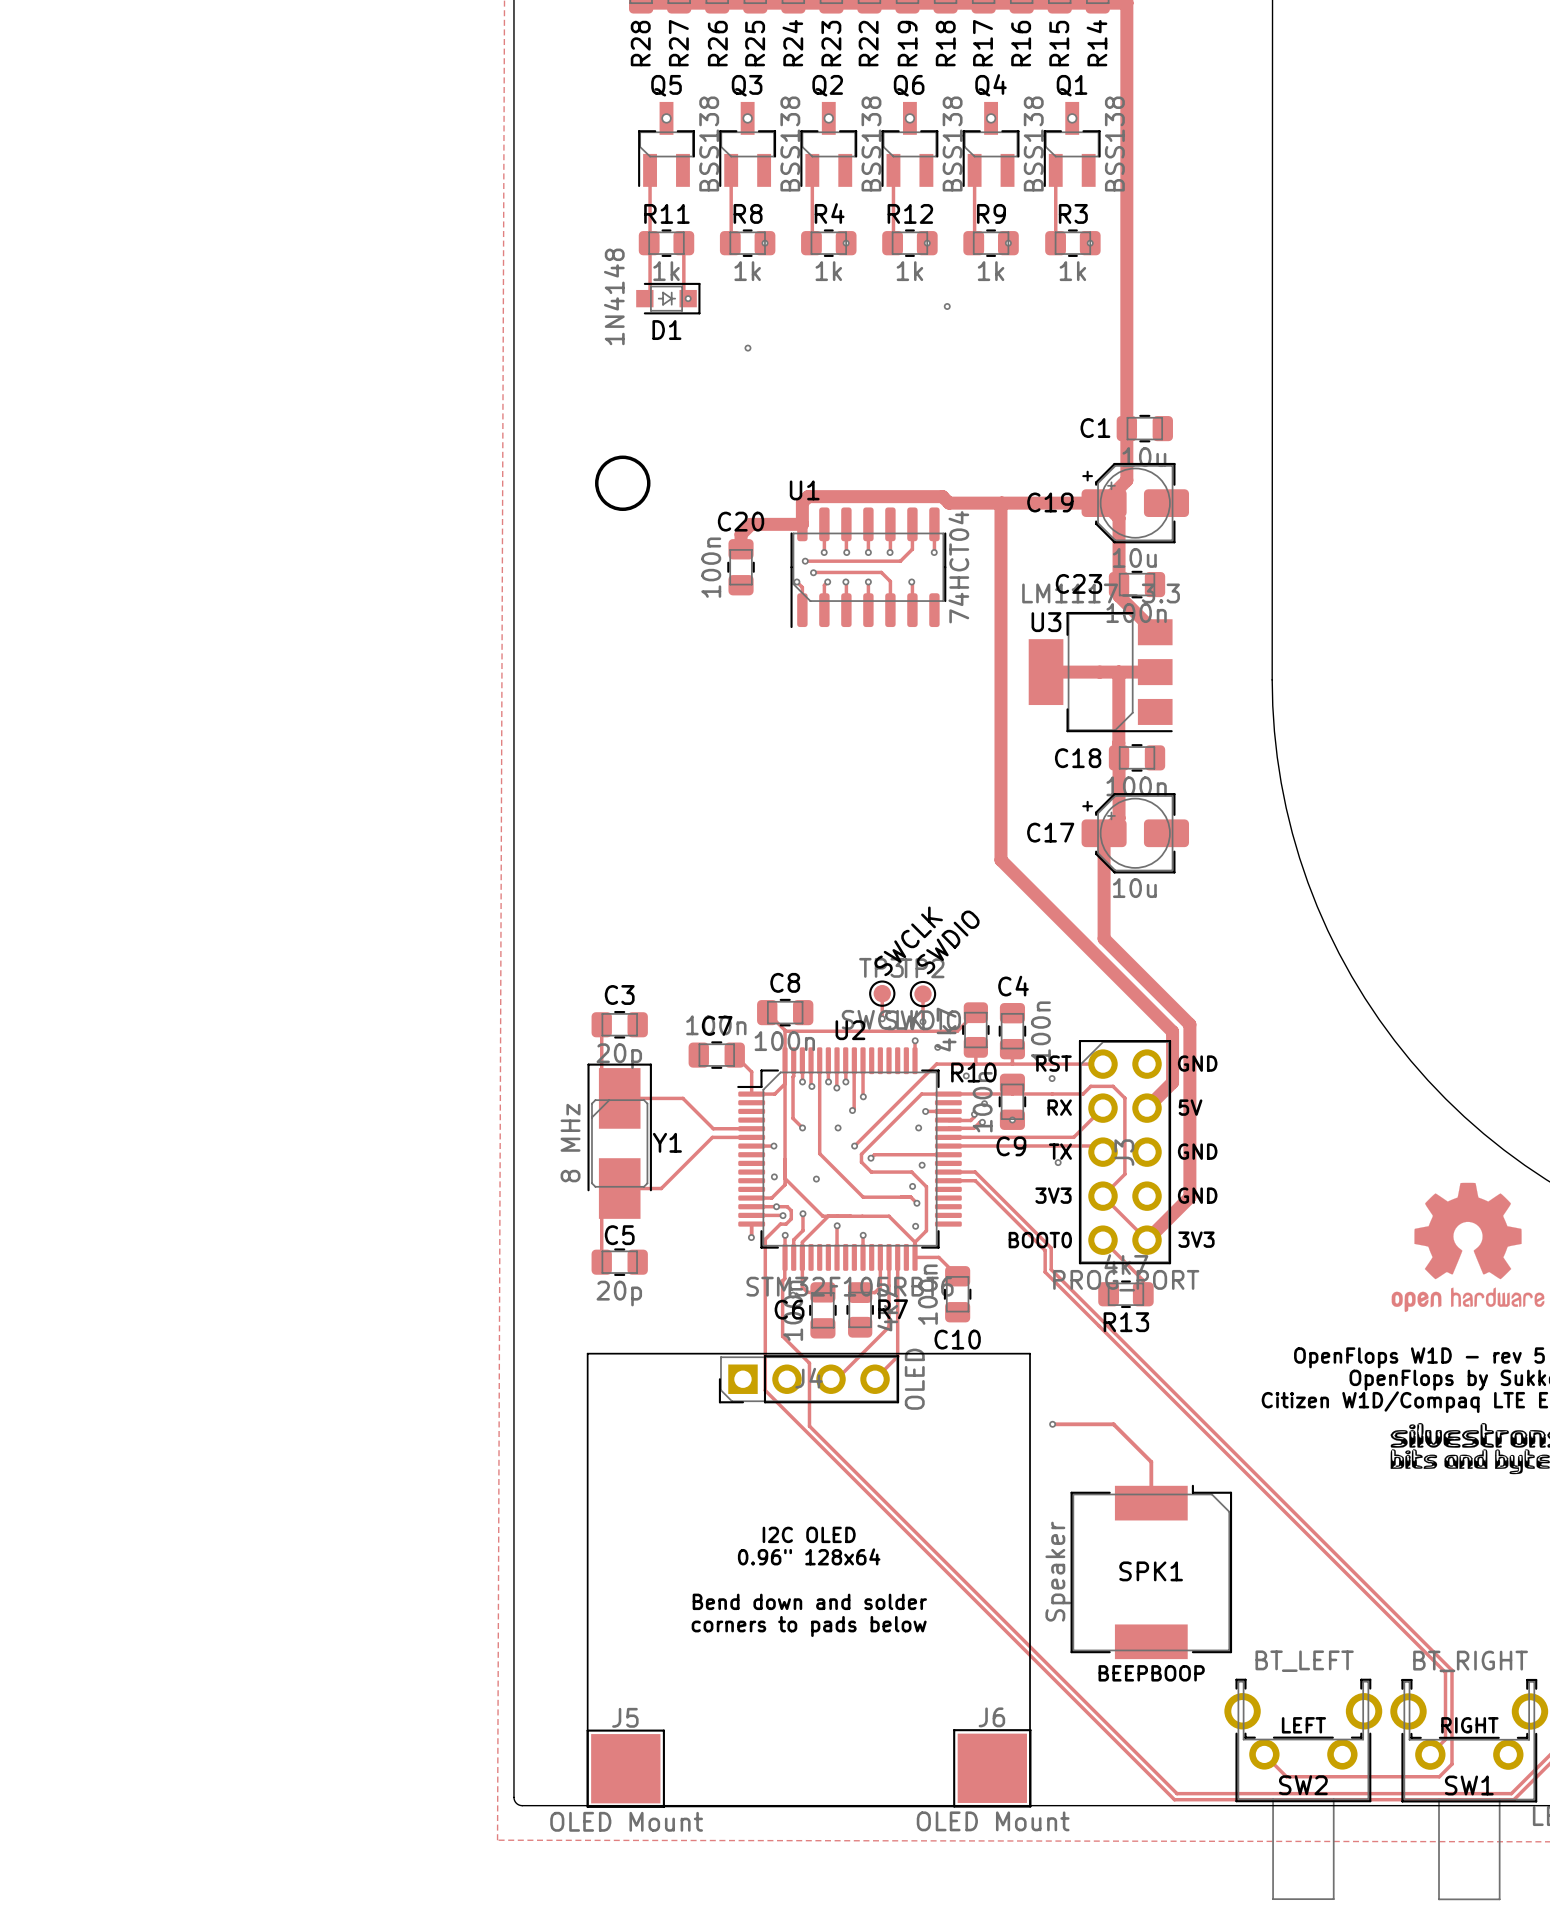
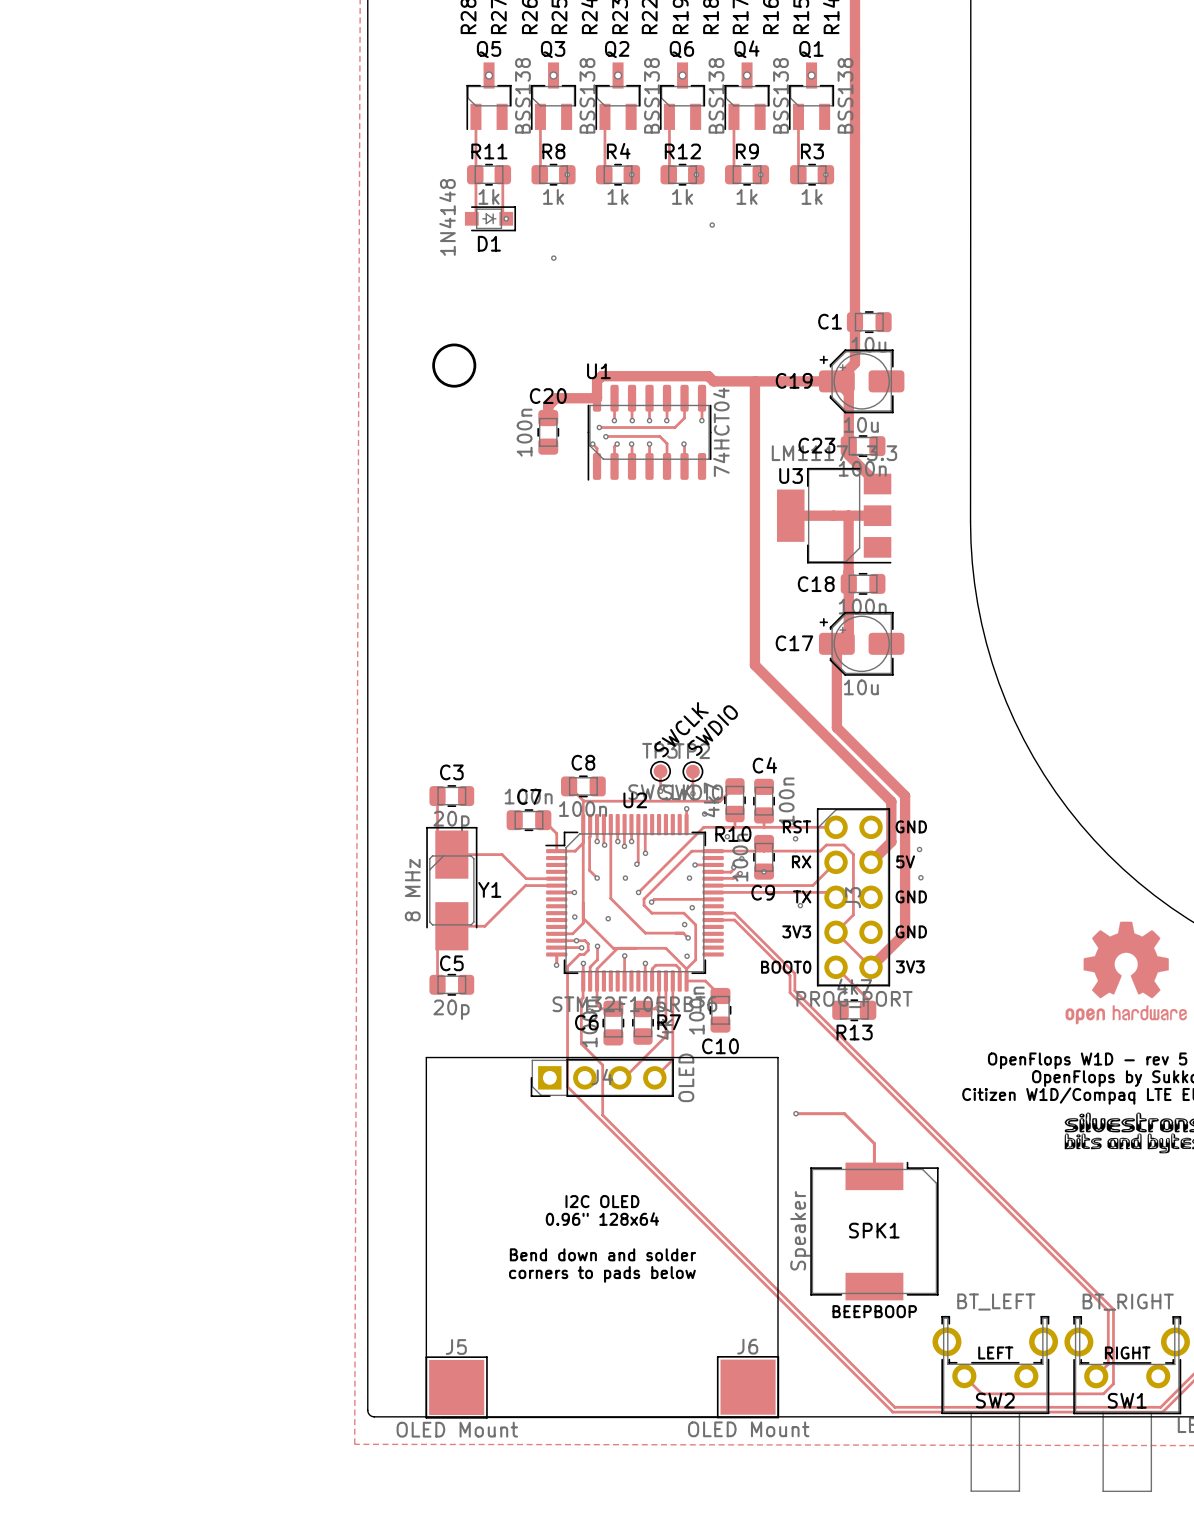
via: none -> (919, 849)
via: none -> (920, 877)
track: none -> (652, 981) (652, 968) (655, 965) (676, 965) (679, 968) (679, 981)

